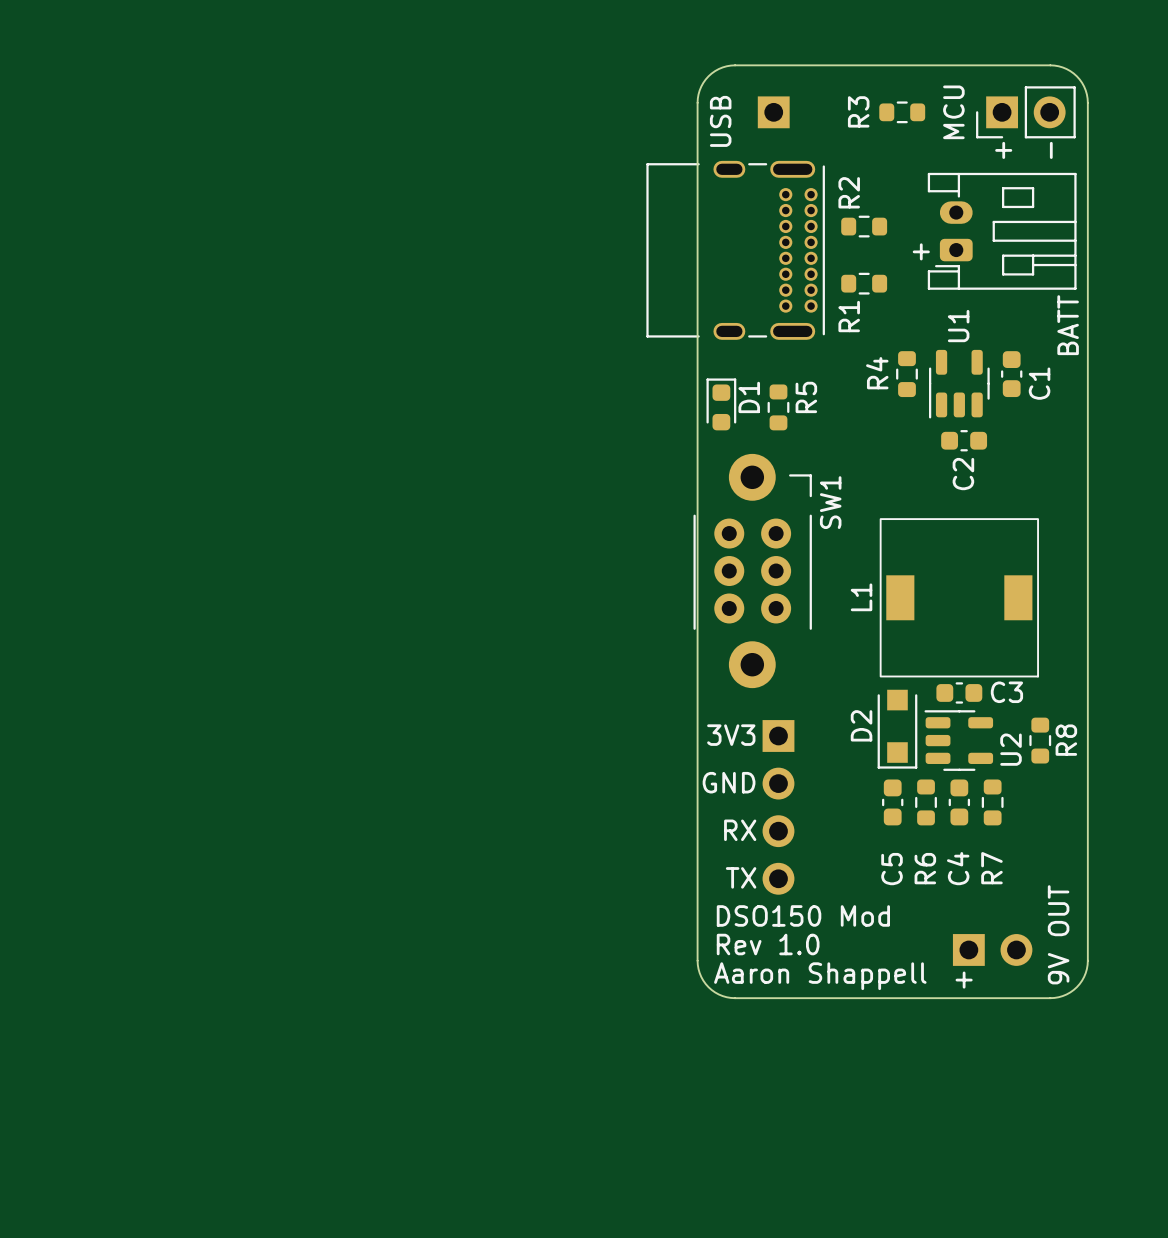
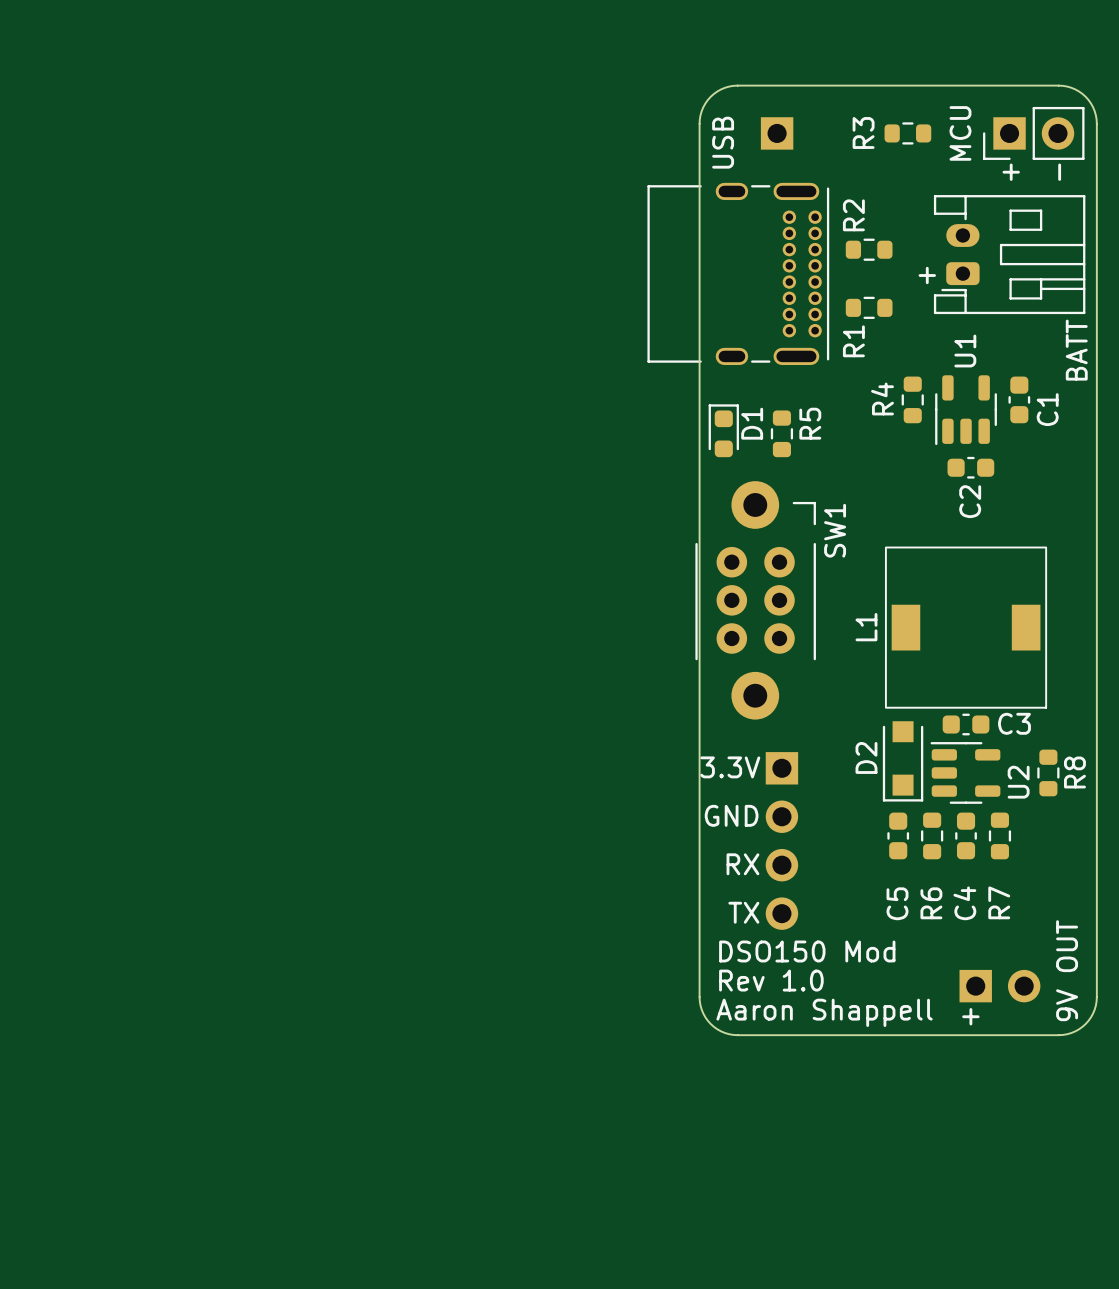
text: 3V3 (731, 735) -> 3.3V (730, 767)

